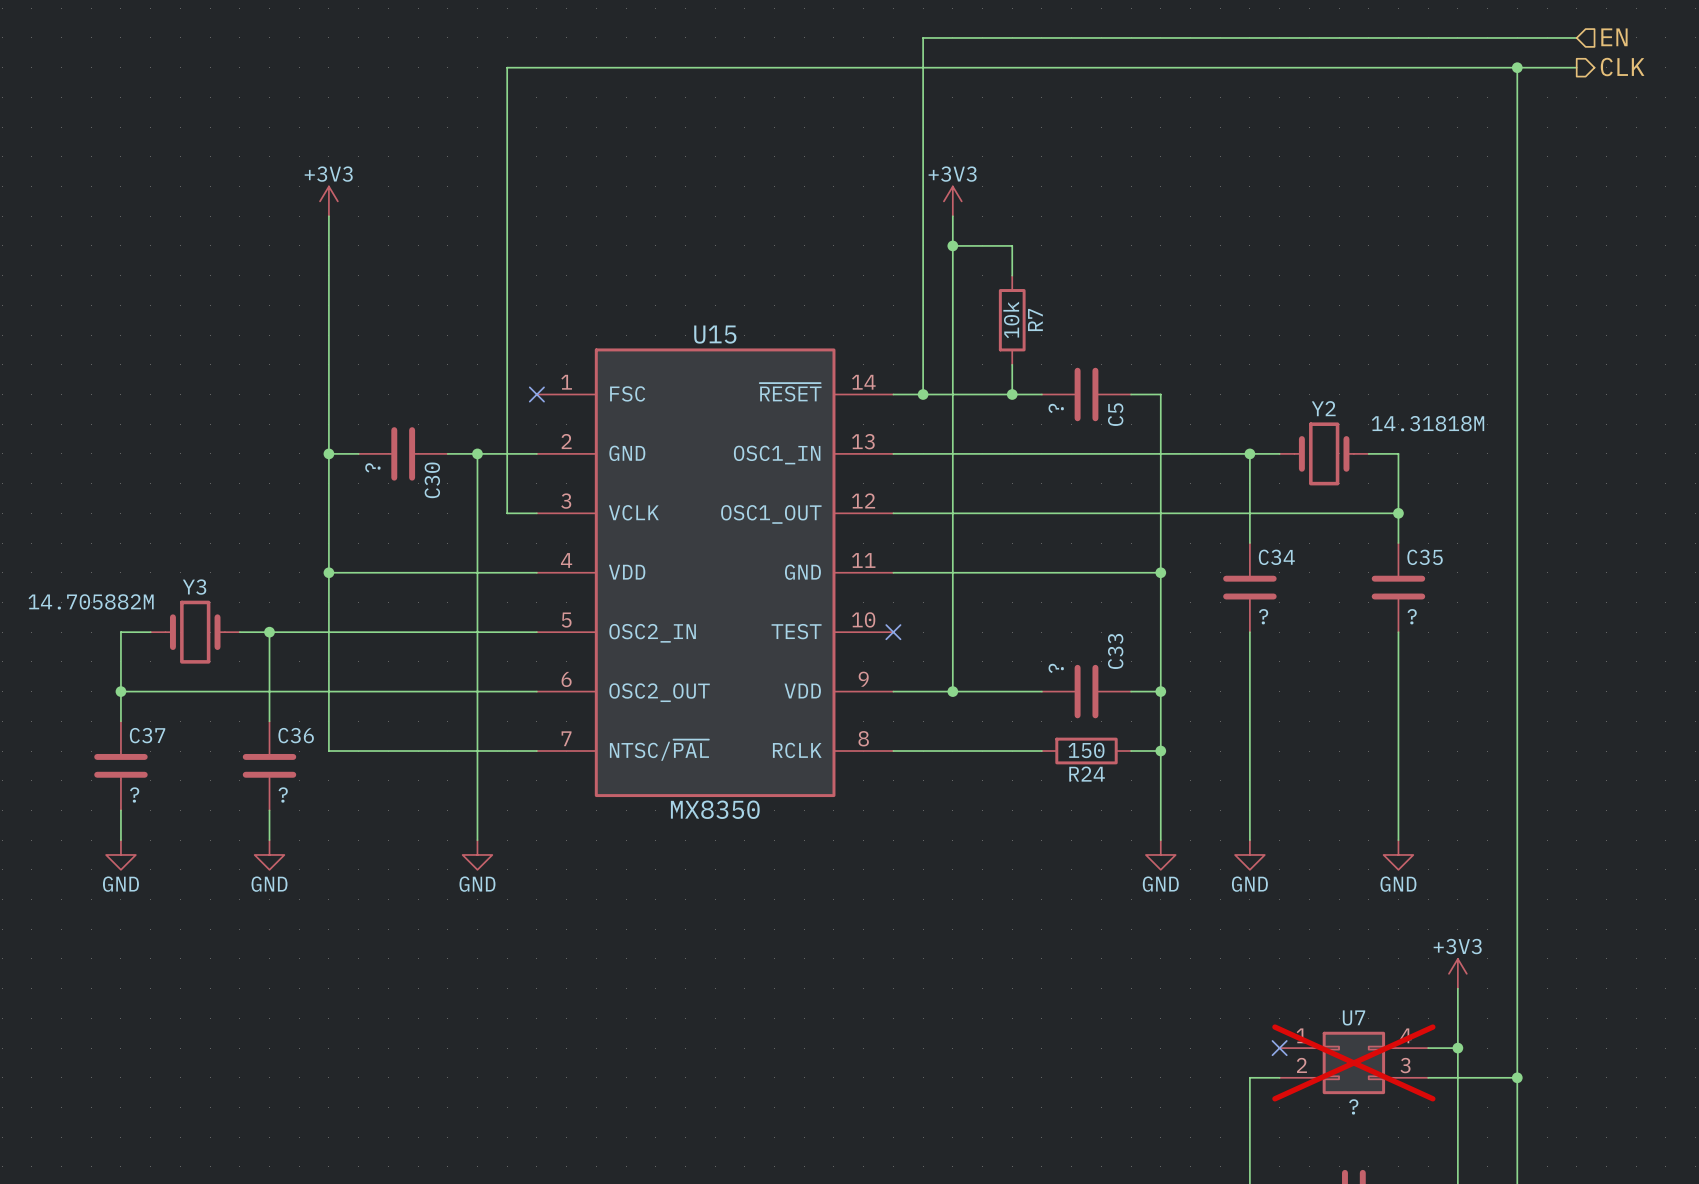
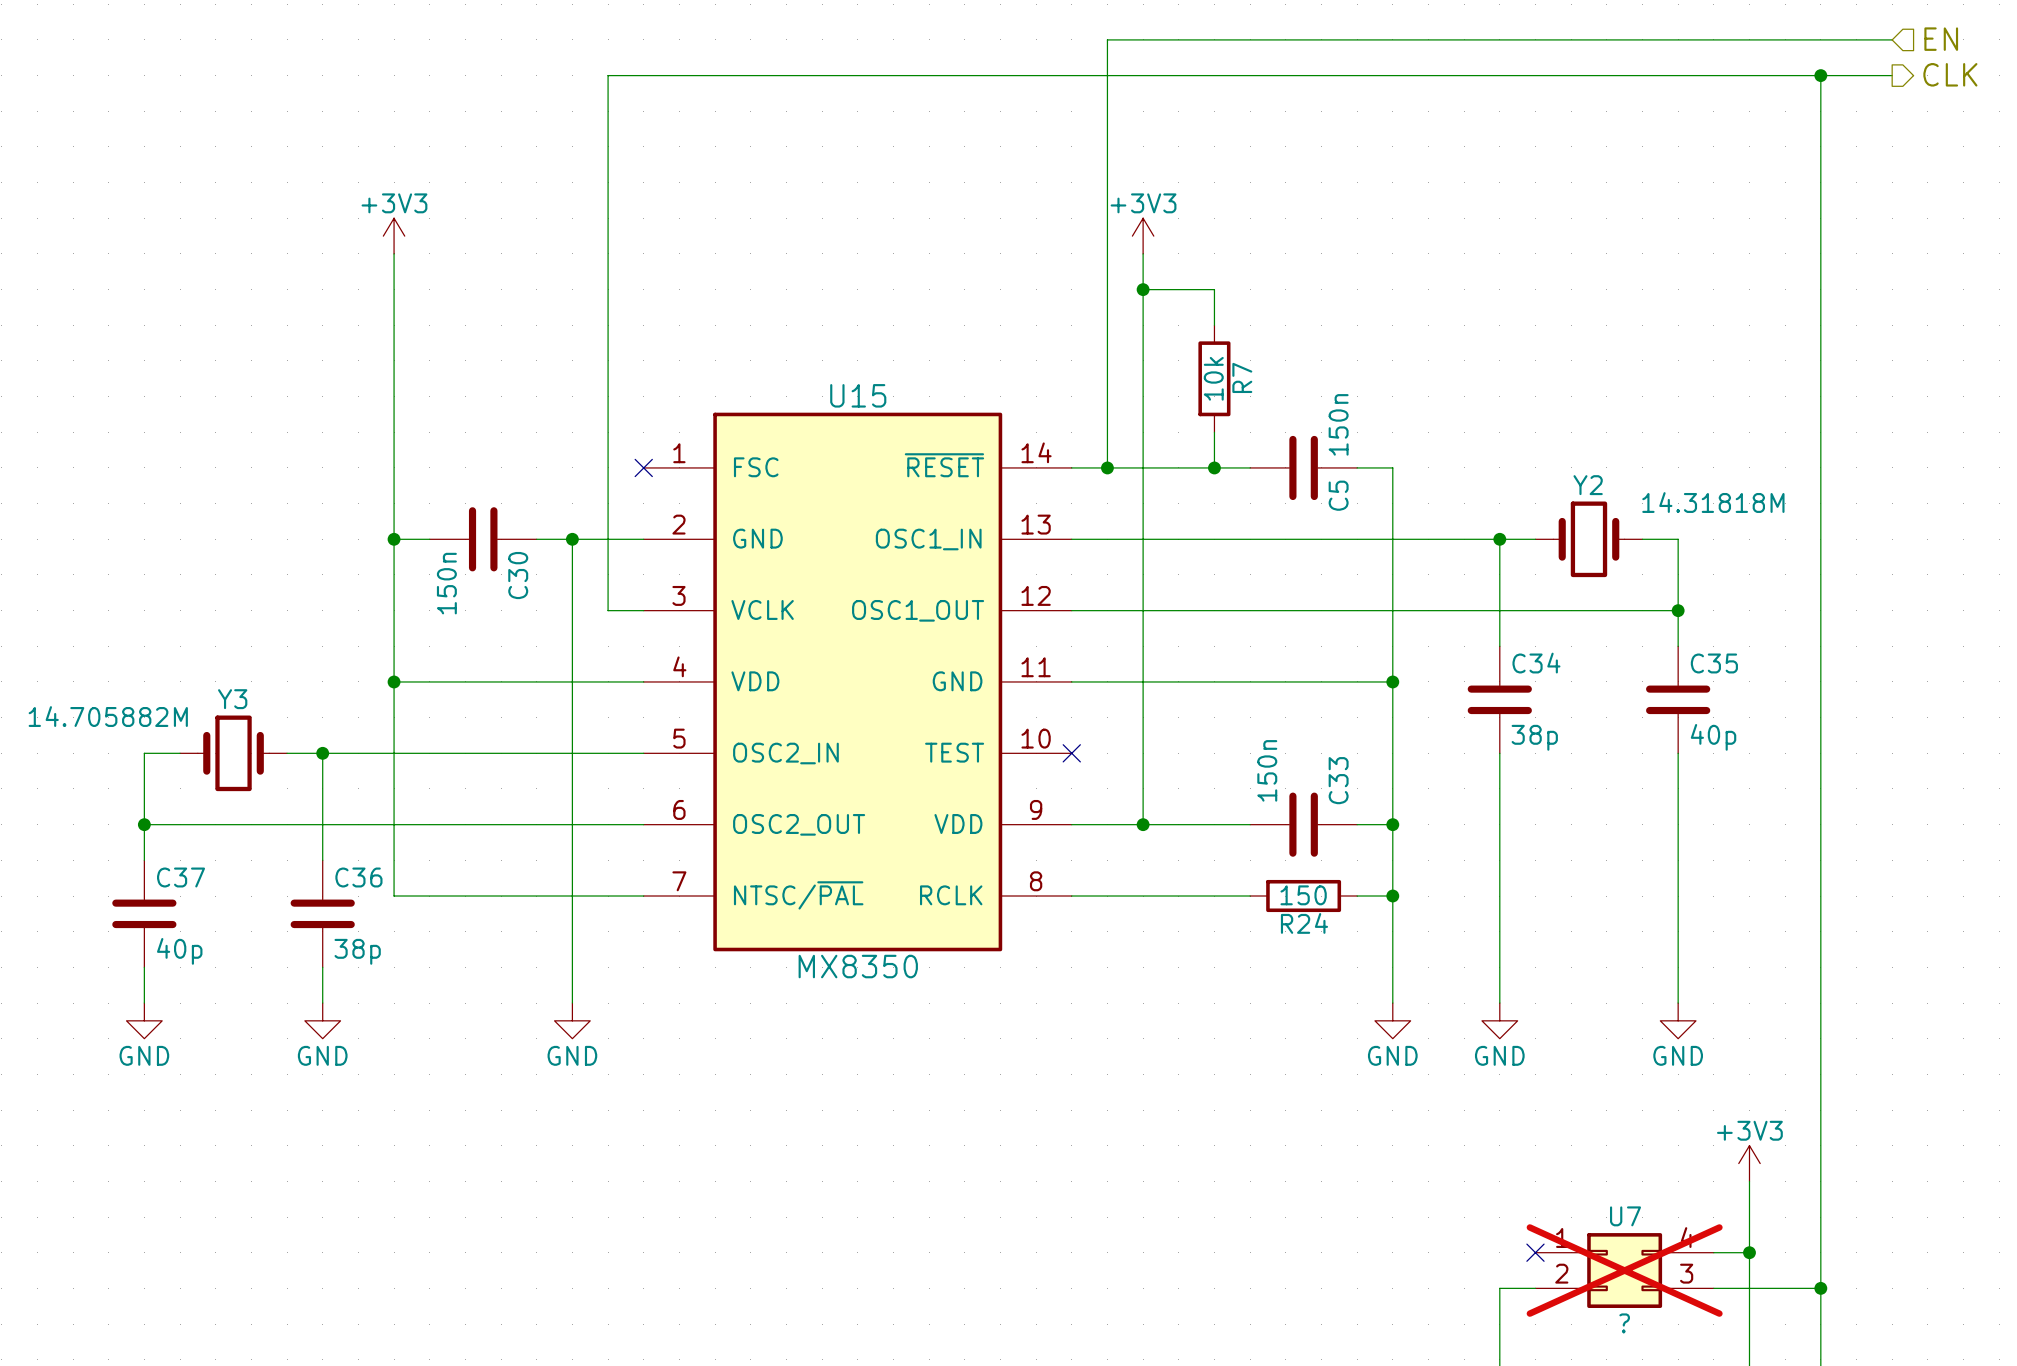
C5 value: ? (1056, 408) -> 150n (1338, 424)
C30 value: ? (372, 467) -> 150n (446, 583)
C34 value: ? (1263, 616) -> 38p (1534, 737)
C35 value: ? (1412, 616) -> 40p (1713, 737)
C33 value: ? (1056, 668) -> 150n (1267, 770)
C37 value: ? (134, 794) -> 40p (179, 951)
C36 value: ? (283, 794) -> 38p (357, 951)

